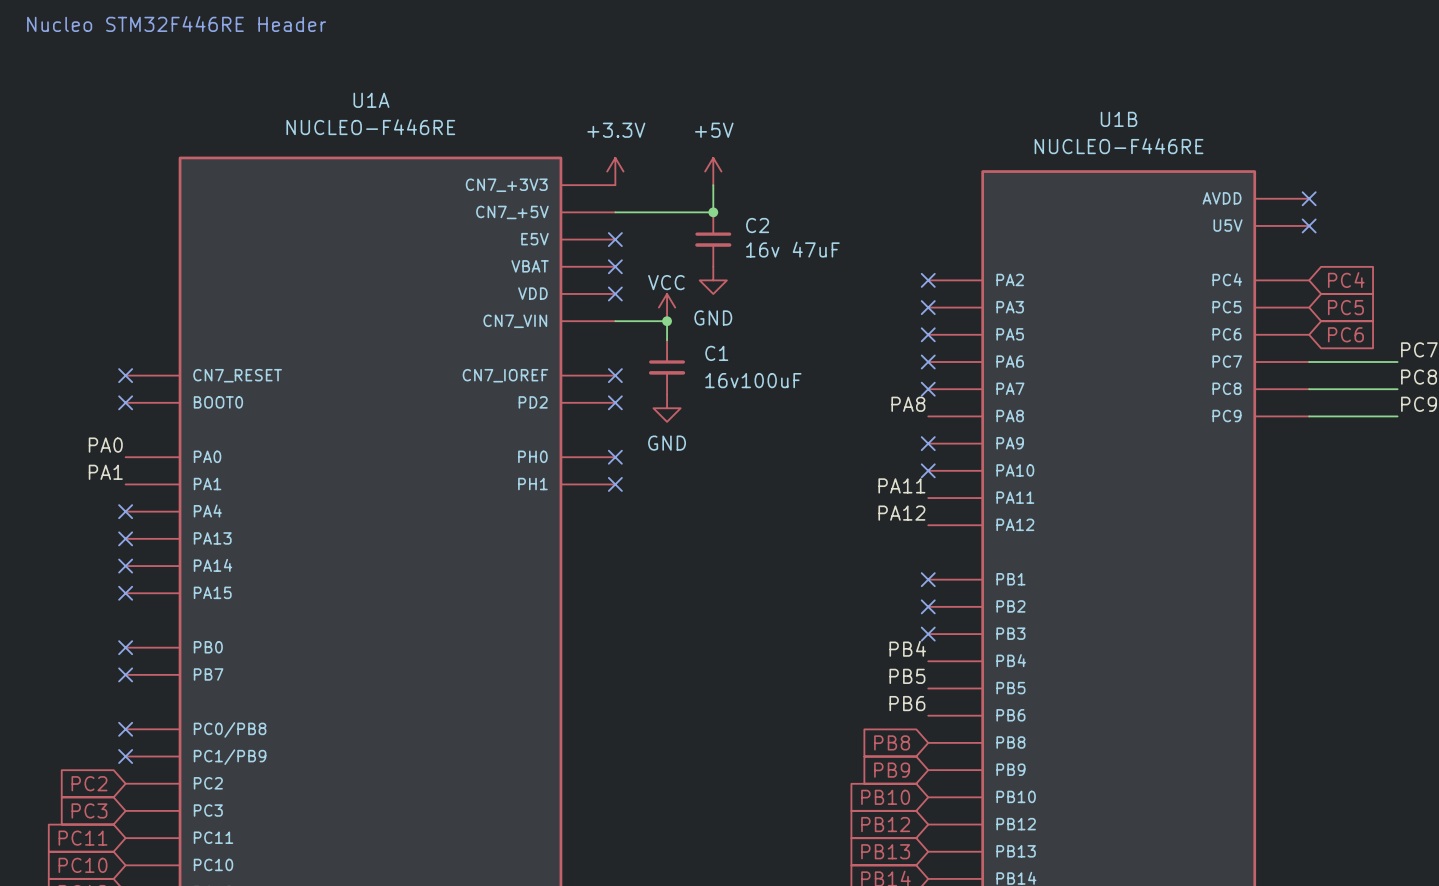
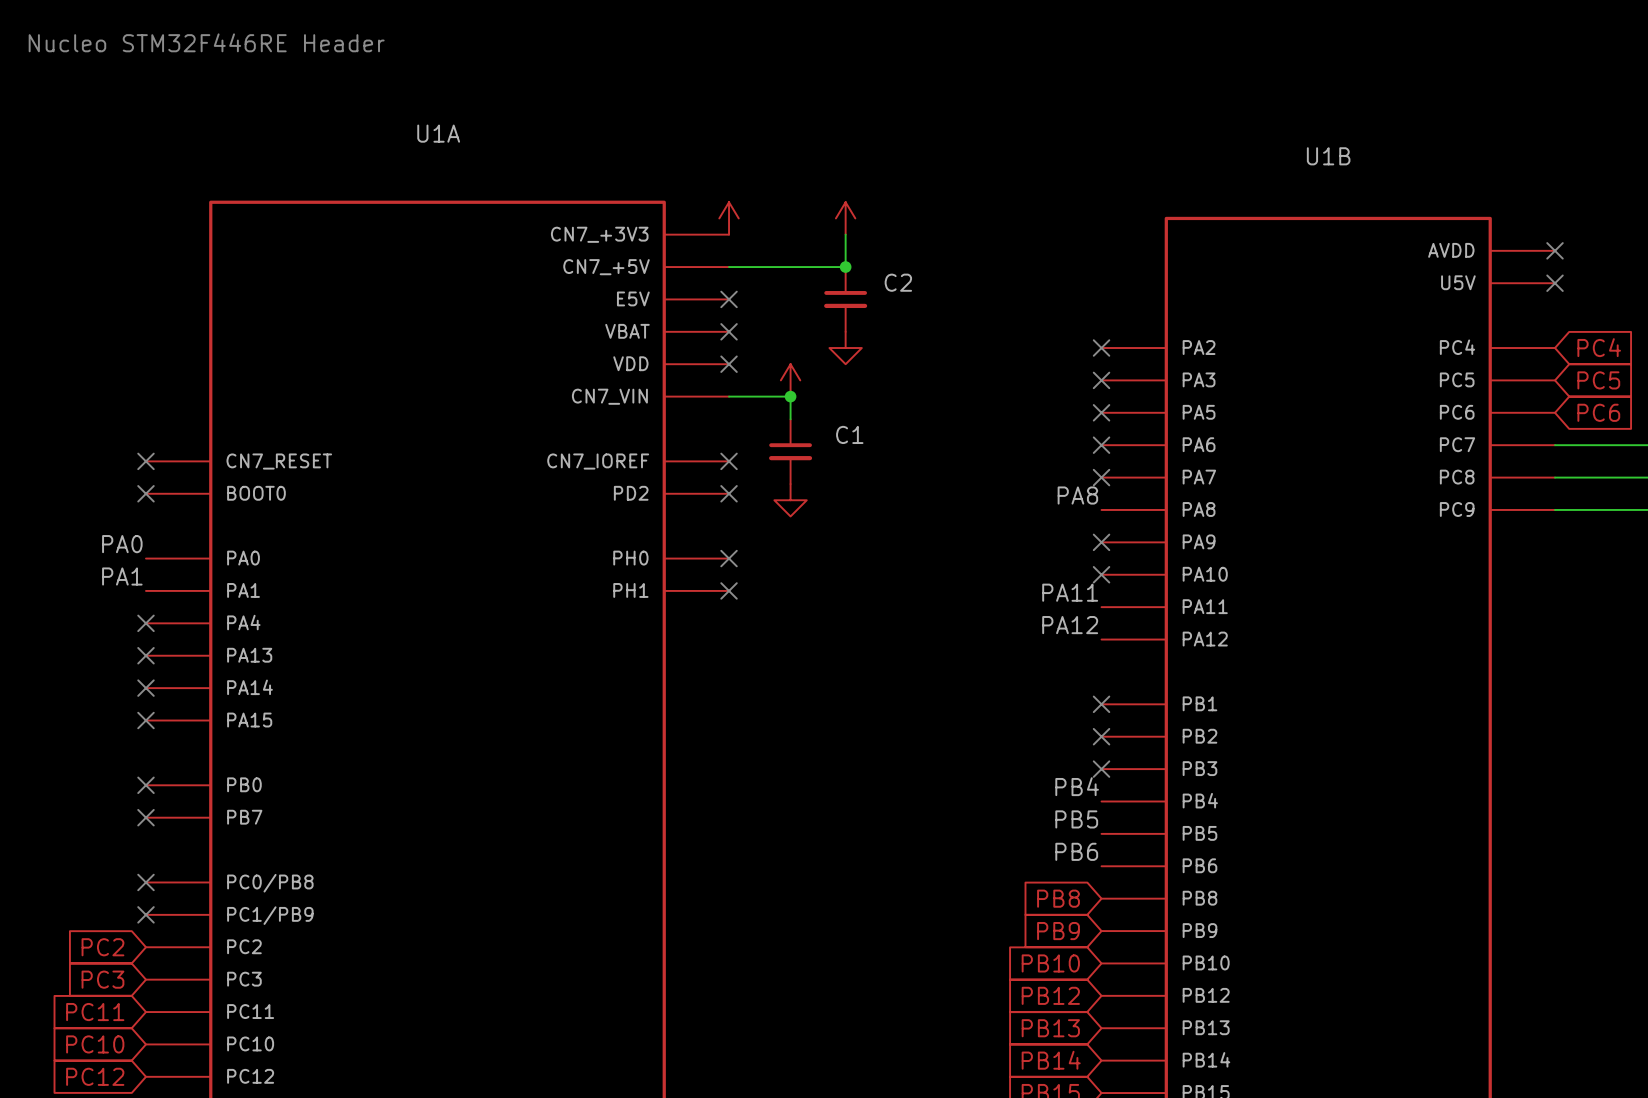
U1A value: NUCLEO-F446RE (370, 127) -> none
power symbol text: +3.3V (616, 130) -> none
power symbol text: +5V (714, 130) -> none
U1B value: NUCLEO-F446RE (1119, 146) -> none
C2 value: 16v 47uF (792, 249) -> none
power symbol text: VCC (666, 282) -> none
power symbol text: GND (713, 317) -> none
C1 value: 16v100uF (753, 380) -> none
power symbol text: GND (667, 443) -> none

